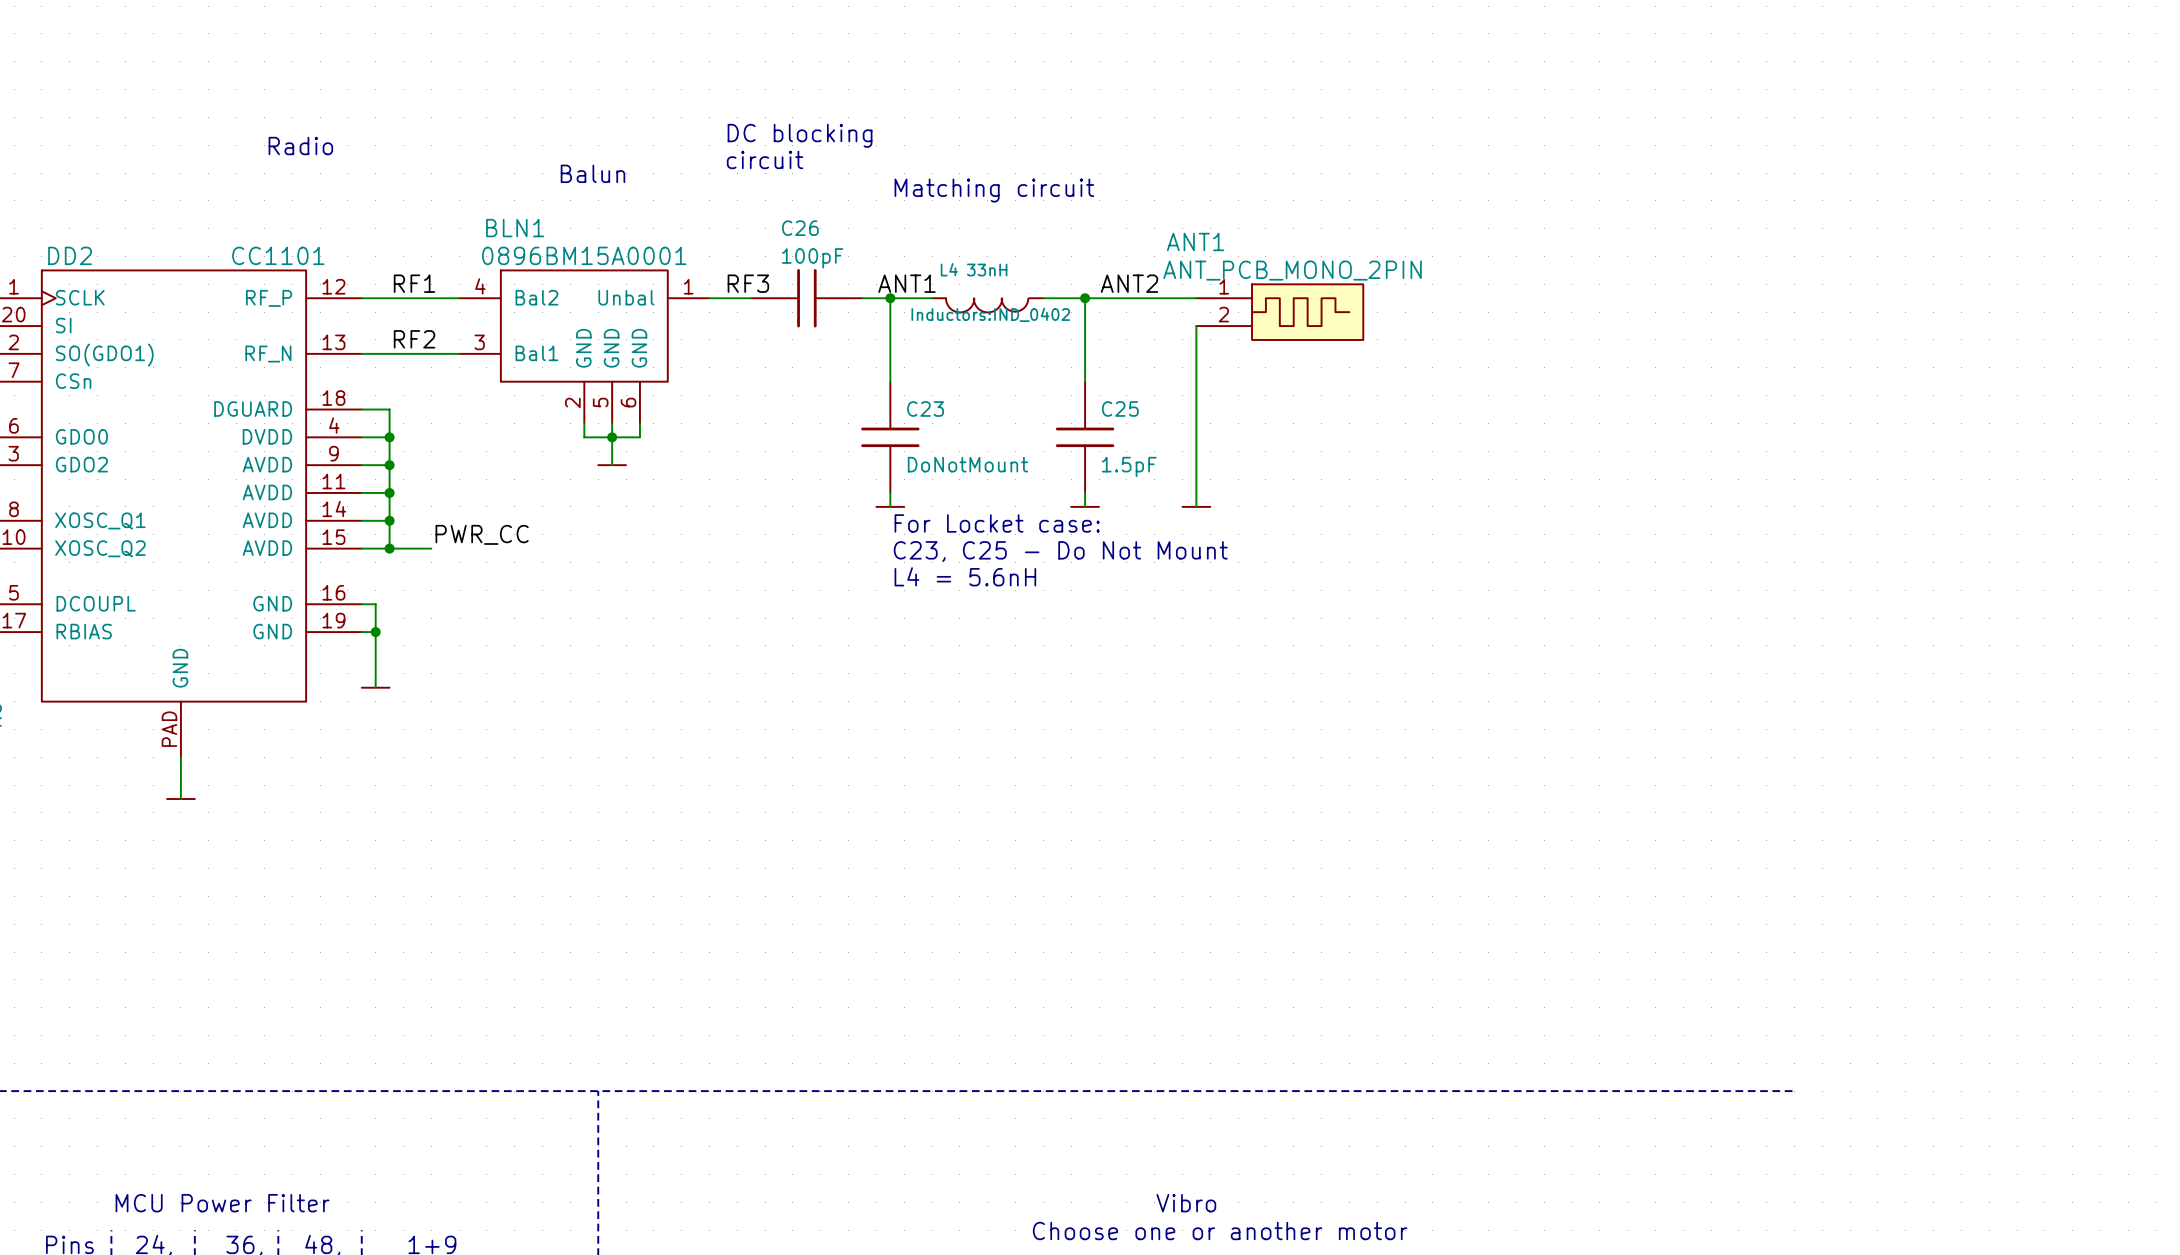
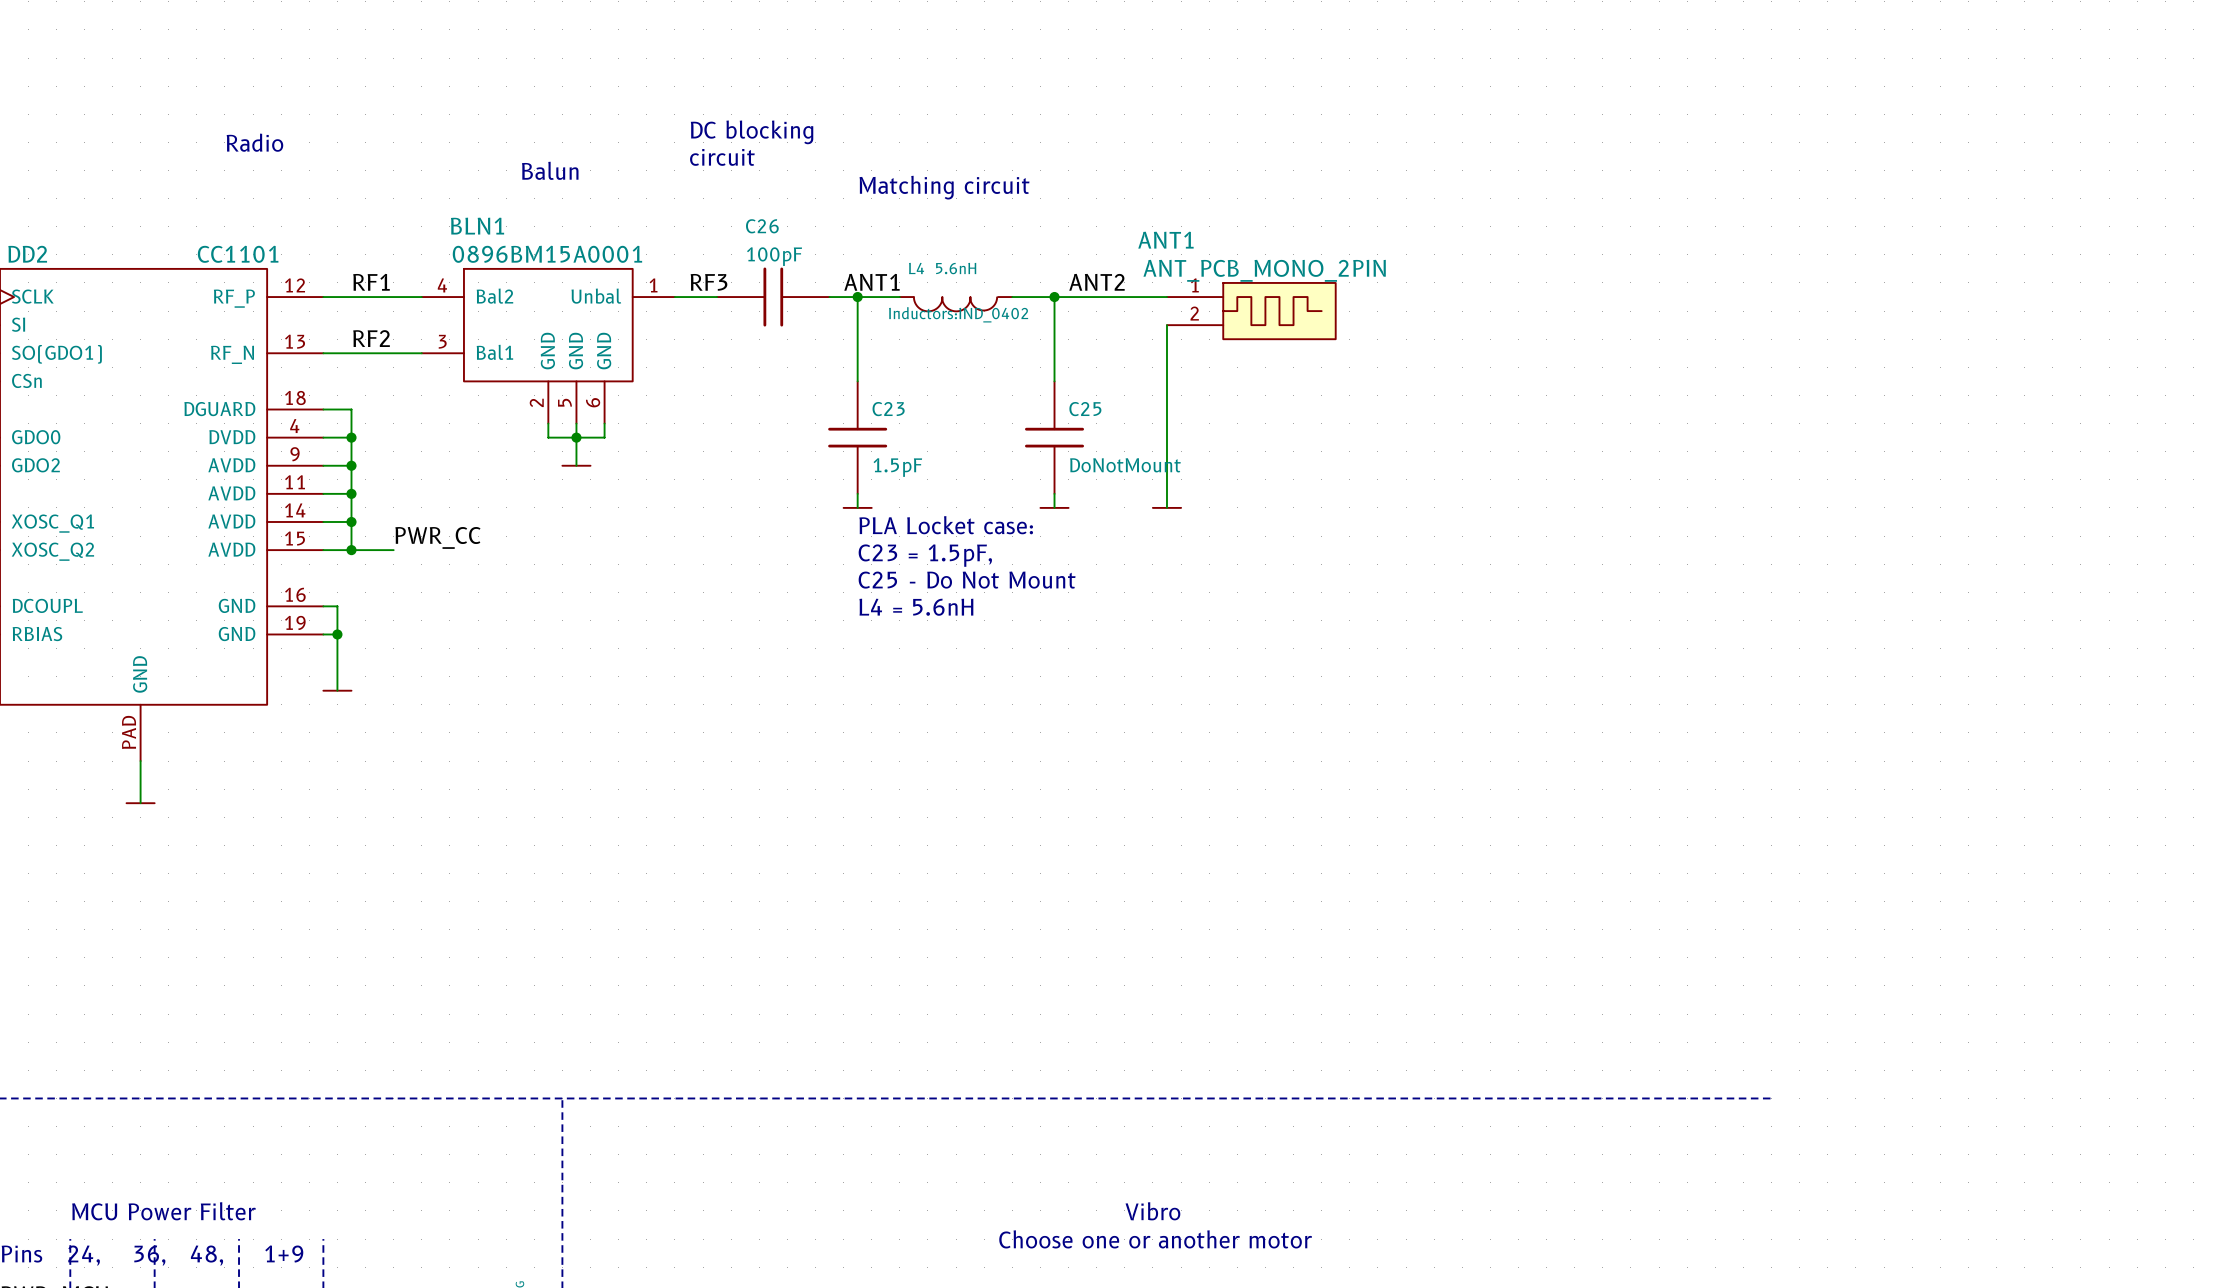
L4 value: 33nH (987, 270) -> 5.6nH (956, 268)
C23 value: DoNotMount (967, 464) -> 1.5pF (897, 467)
C25 value: 1.5pF (1129, 466) -> DoNotMount (1125, 465)
text: For Locket case: (997, 523) -> PLA Locket case: (946, 525)
text: C23, C25 - Do Not Mount (1060, 551) -> C23 = 1.5pF, (925, 555)
text: L4 = 5.6nH (965, 576) -> C25 - Do Not Mount (967, 580)
text: none -> L4 = 5.6nH (916, 607)

